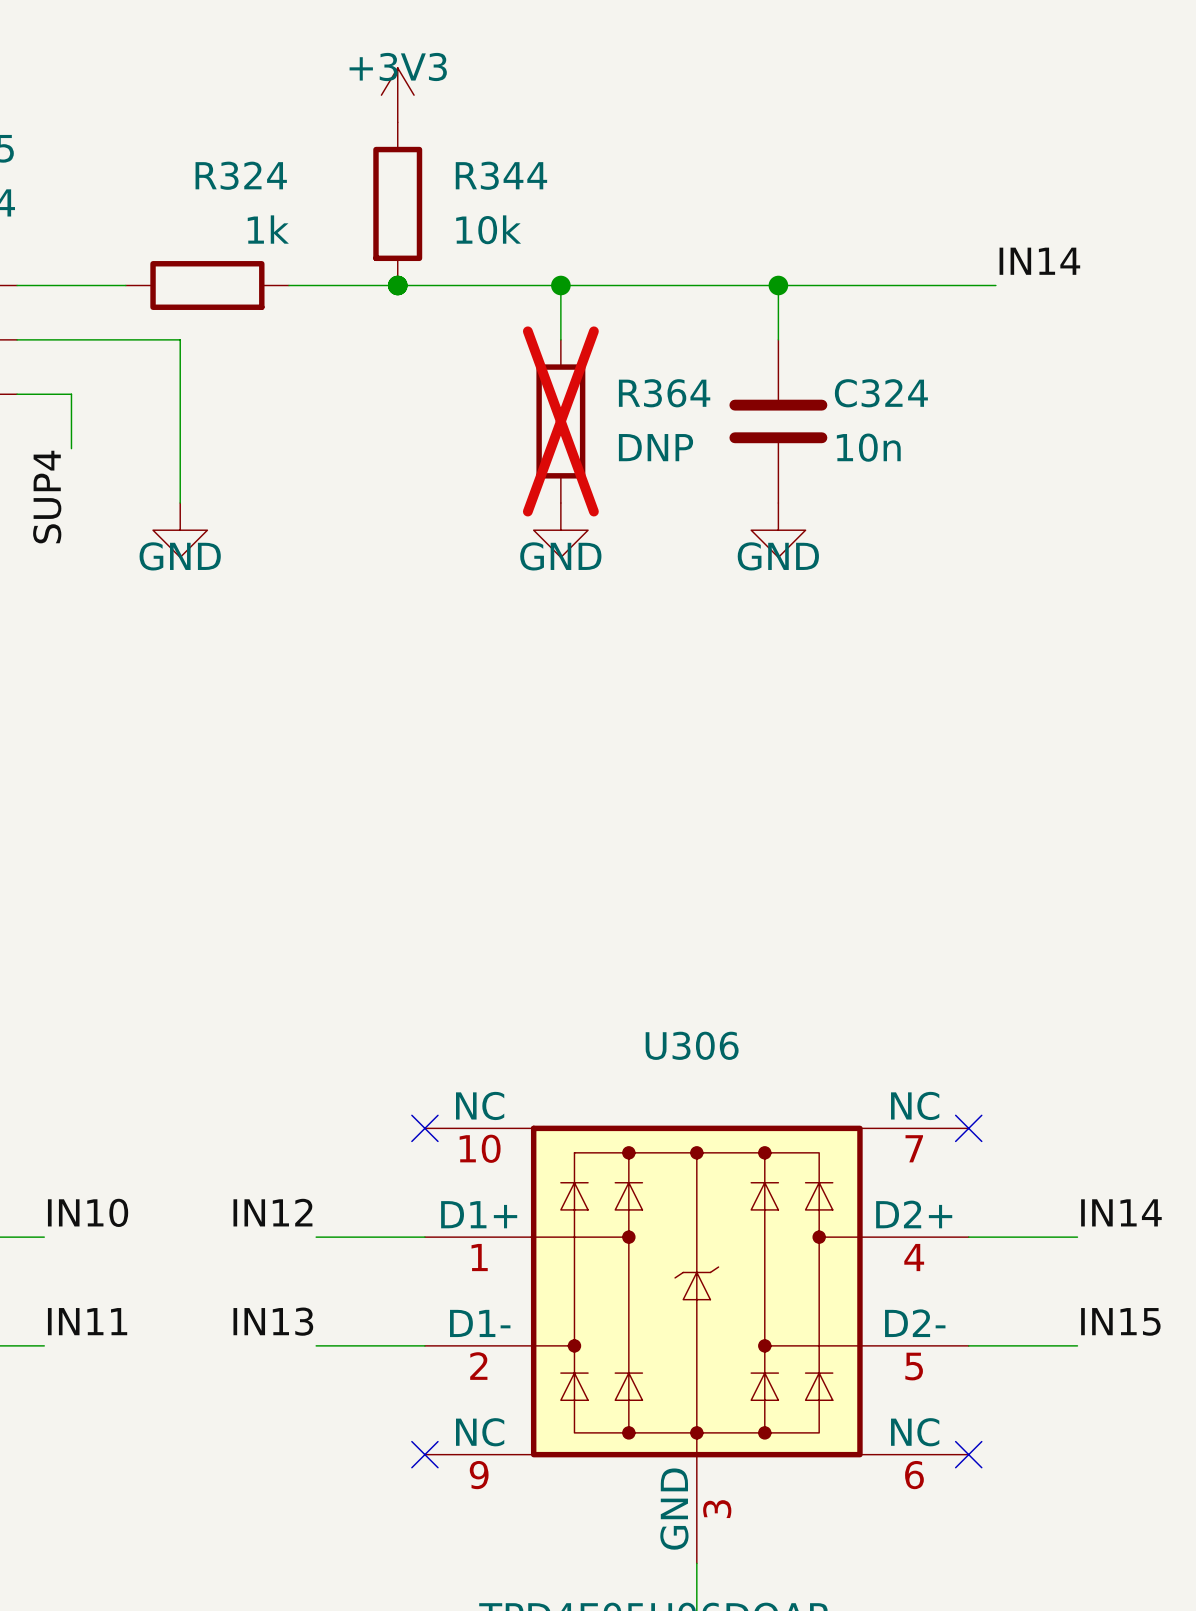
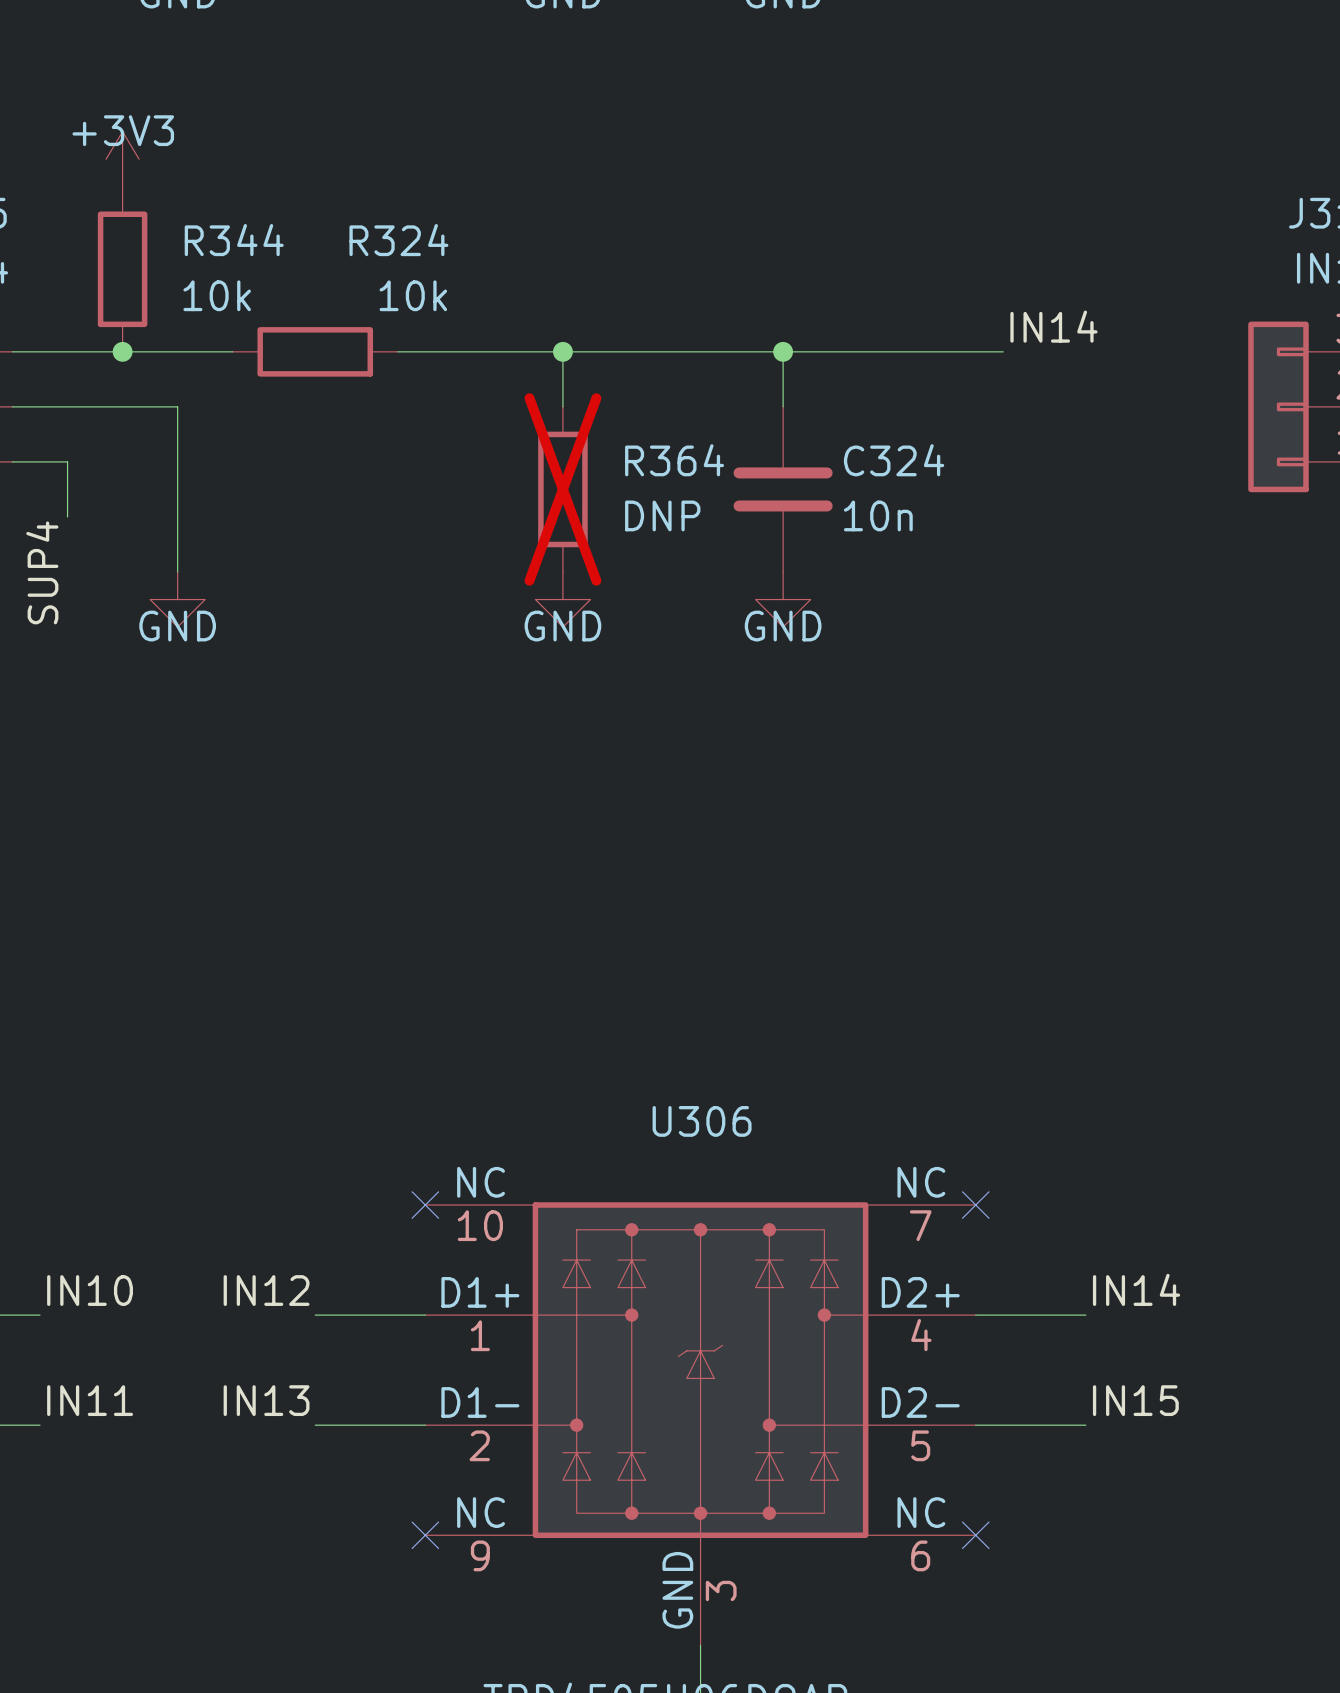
power symbol position: +3V3 (397, 95) -> +3V3 (122, 159)
R324 name position: R324 (241, 175) -> R324 (398, 240)
R344 position: (397, 203) -> (122, 269)
R324 value: 1k (268, 229) -> 10k (413, 295)
junction: none -> (122, 351)
R324 position: (207, 285) -> (315, 351)
wire: (288, 285) (397, 285) -> (122, 351) (232, 351)
junction: (397, 285) -> none

